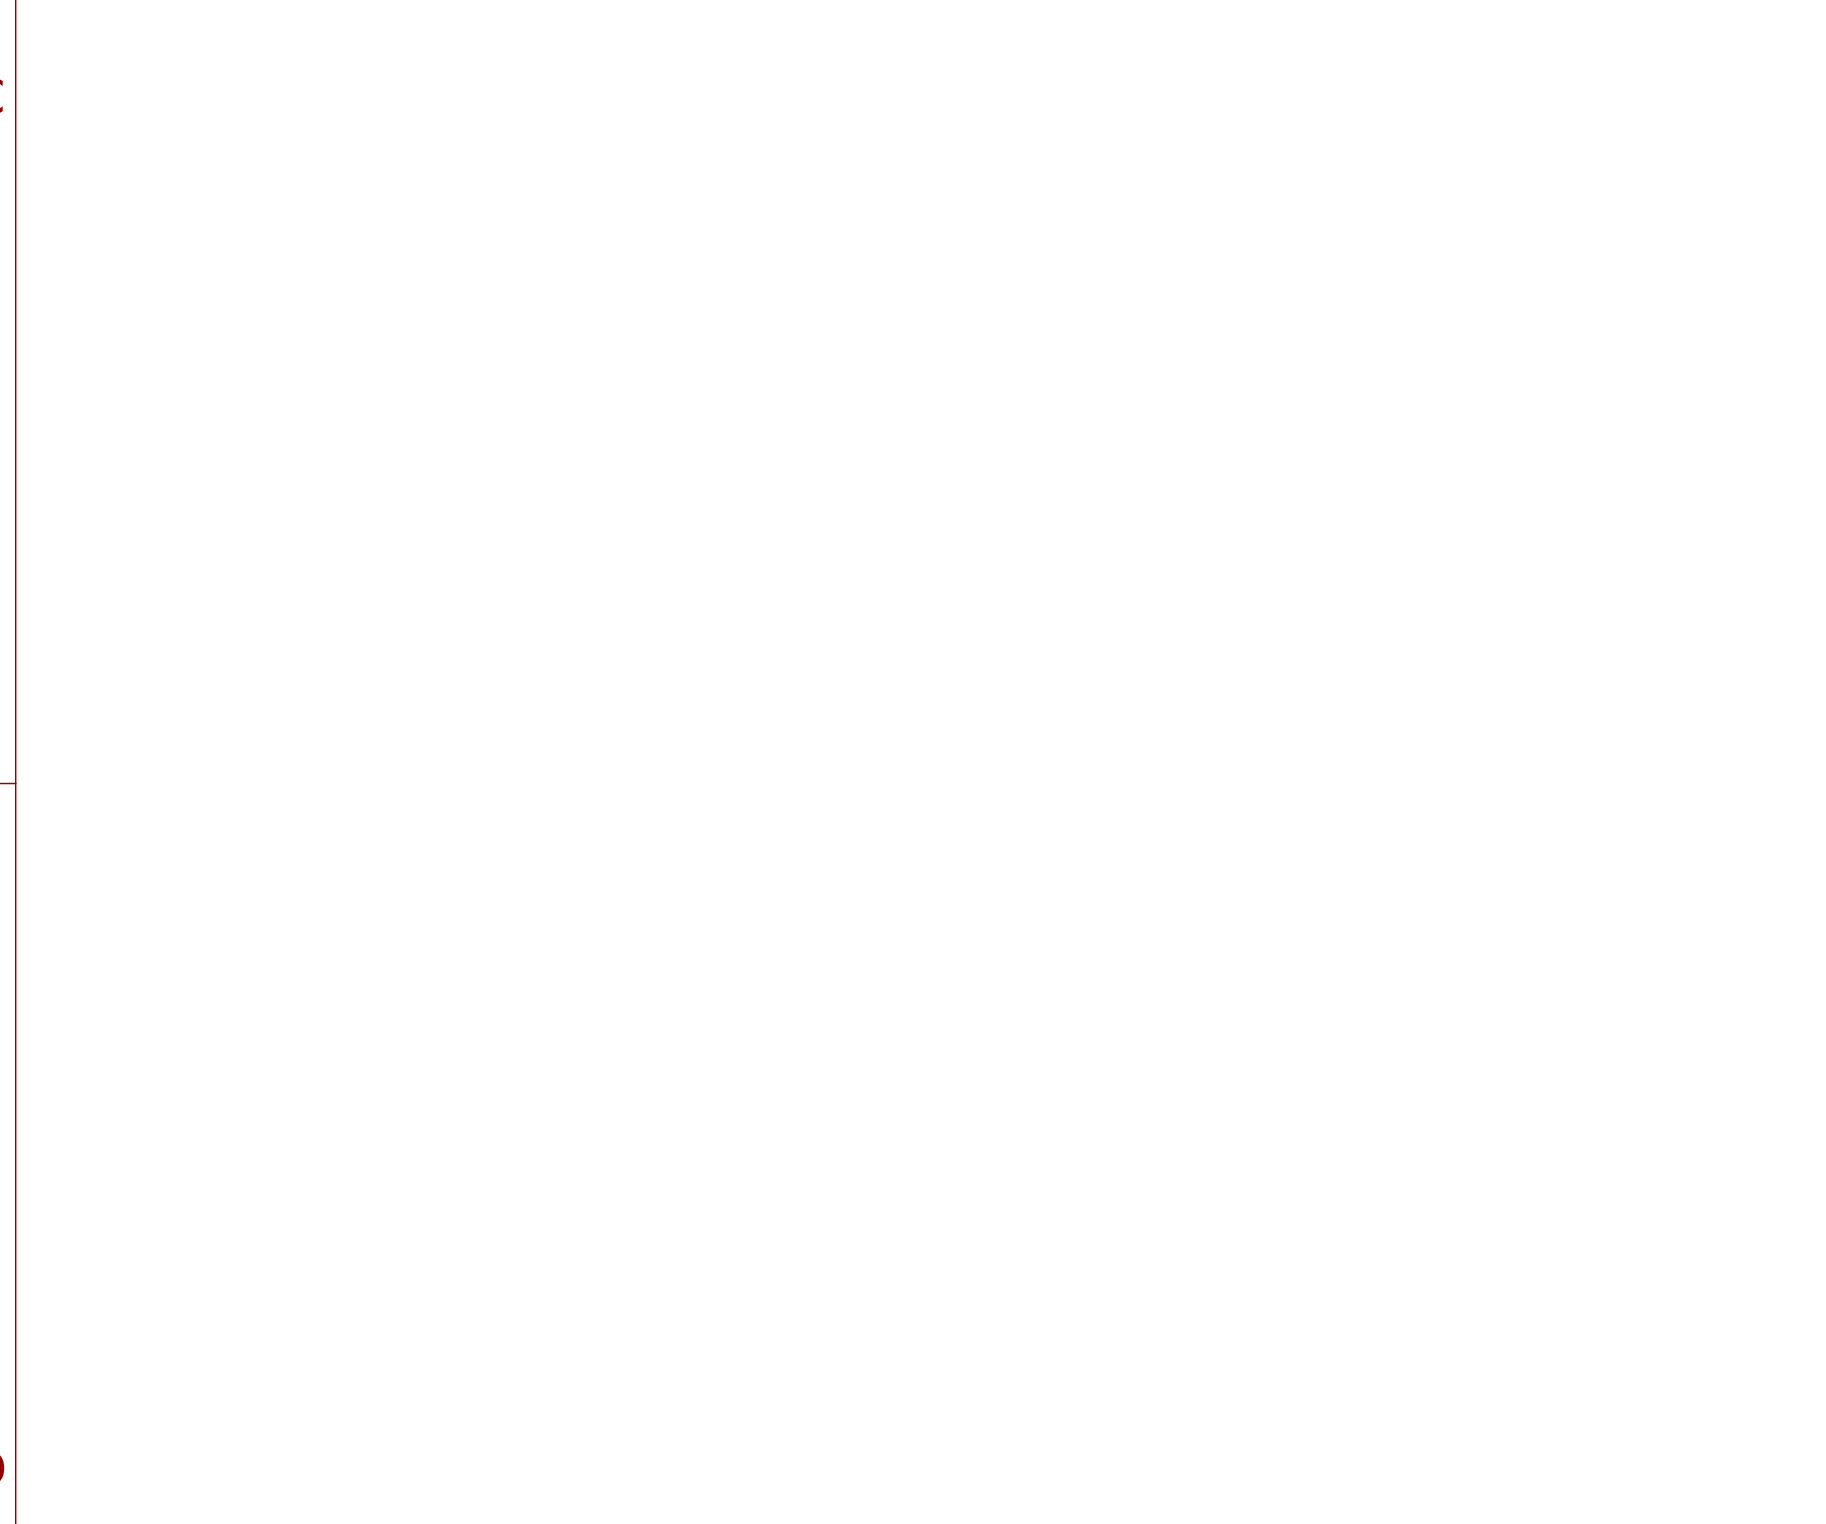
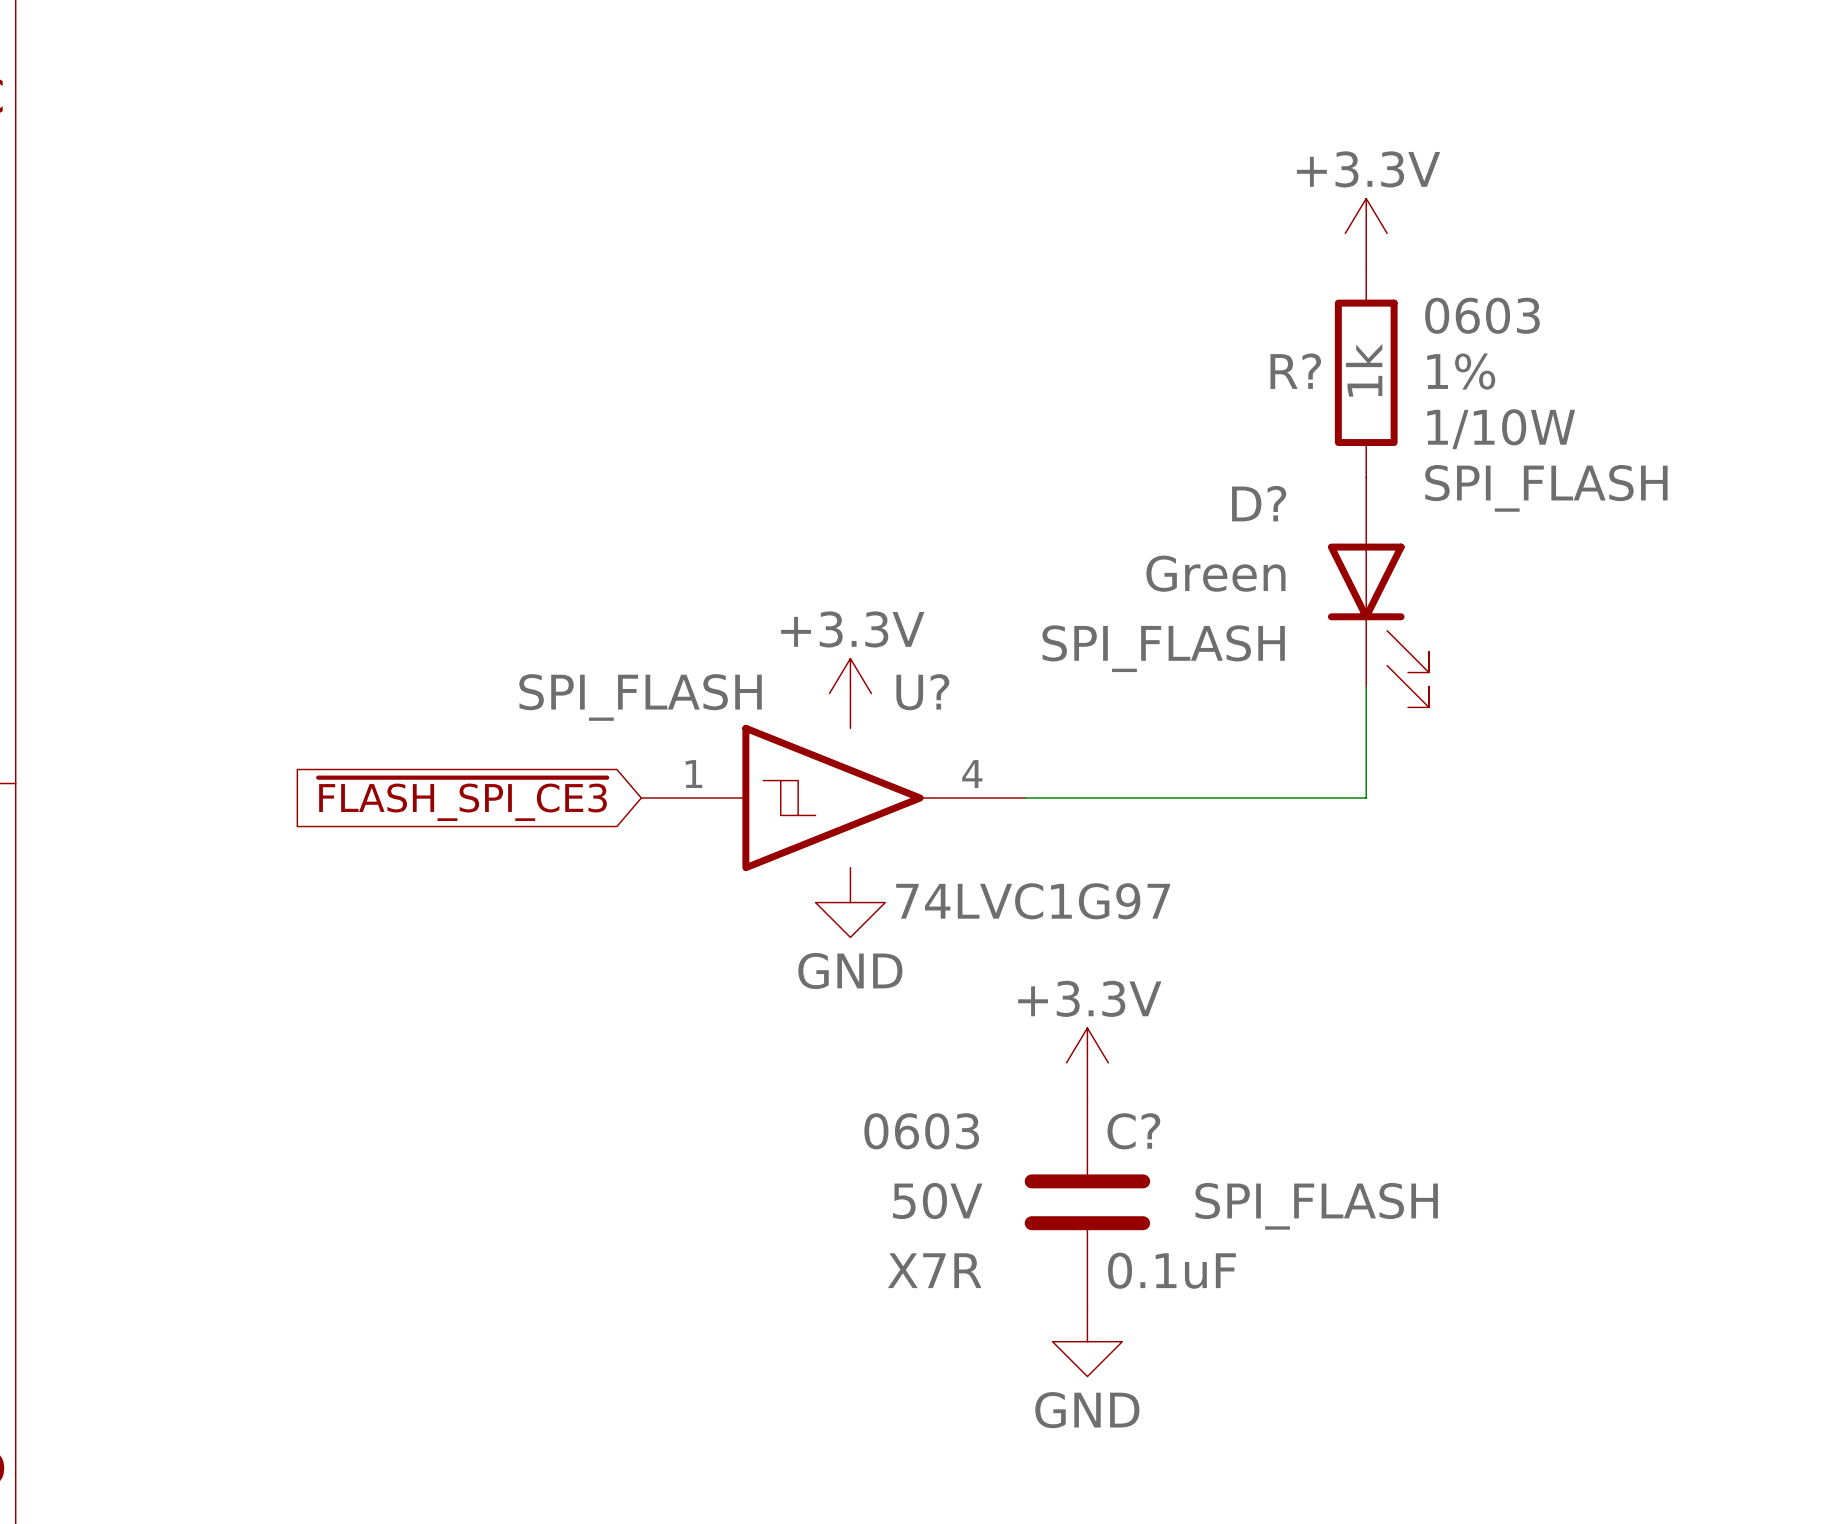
power symbol: none -> +3.3V (1366, 233)
R?: none -> 1k (1366, 372)
D?: none -> Green (1378, 592)
wire: none -> (1366, 686) (1366, 798) (1024, 798)
power symbol: none -> +3.3V (850, 693)
U?: none -> 74LVC1G97 (833, 798)
global label: none -> ~{FLASH_SPI_CE3} (462, 799)
power symbol: none -> GND (850, 902)
power symbol: none -> +3.3V (1087, 1062)
C?: none -> 0.1uF (1087, 1202)
power symbol: none -> GND (1087, 1341)

